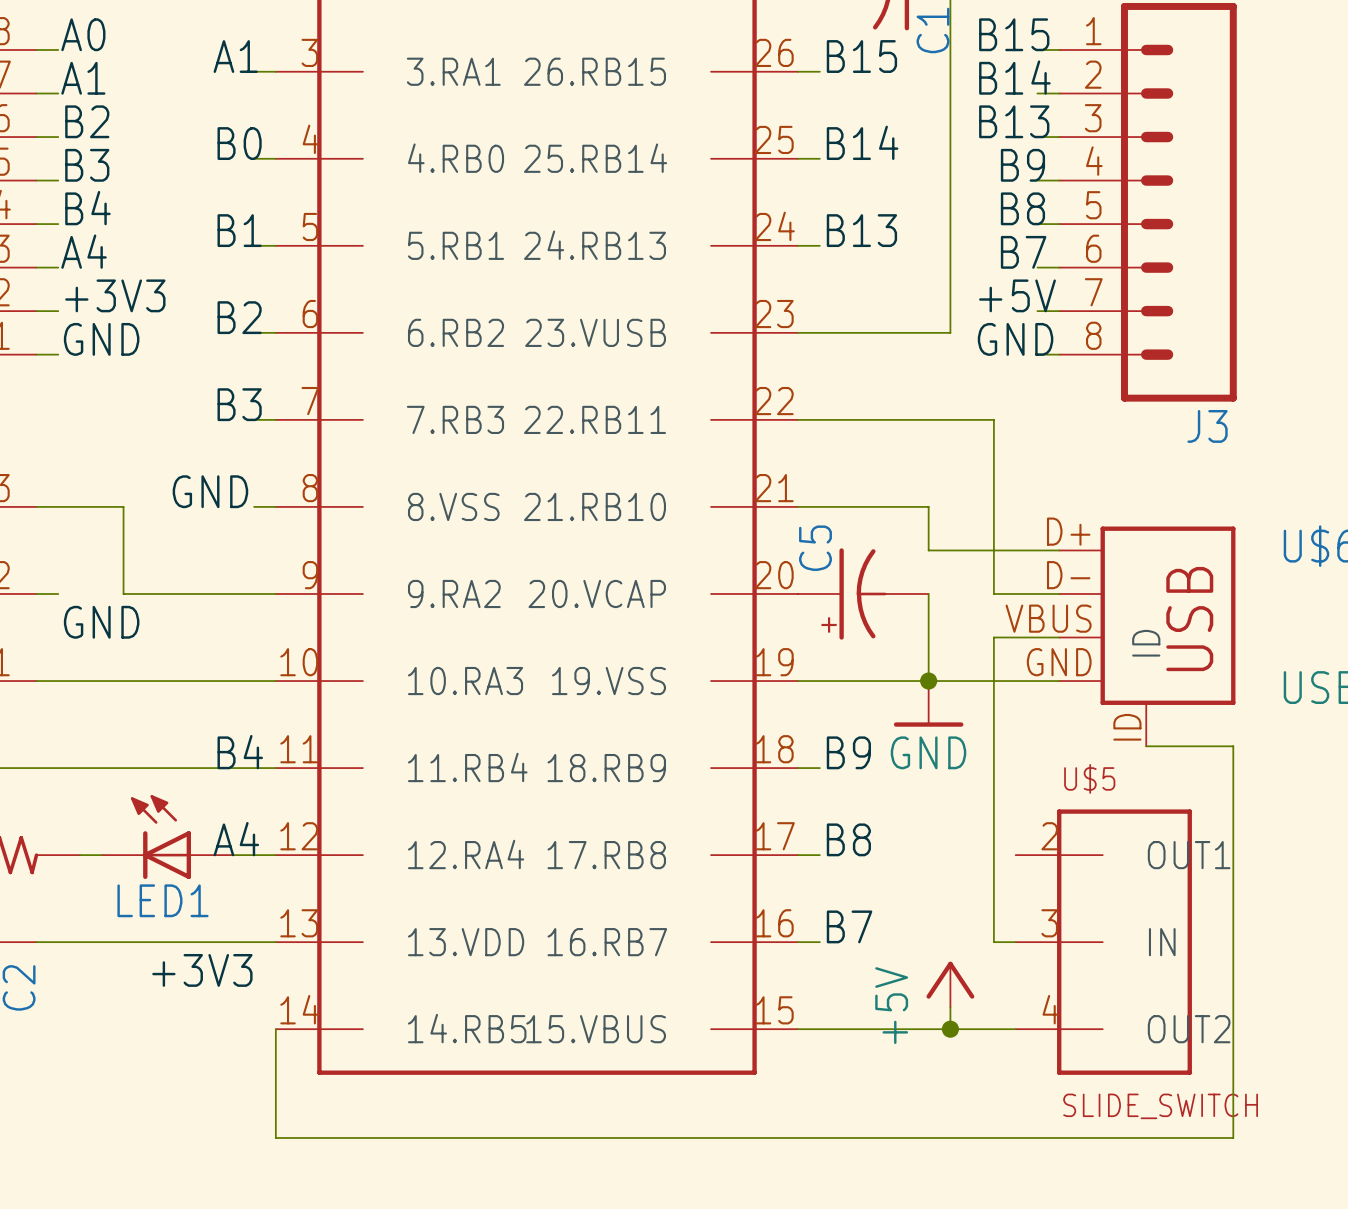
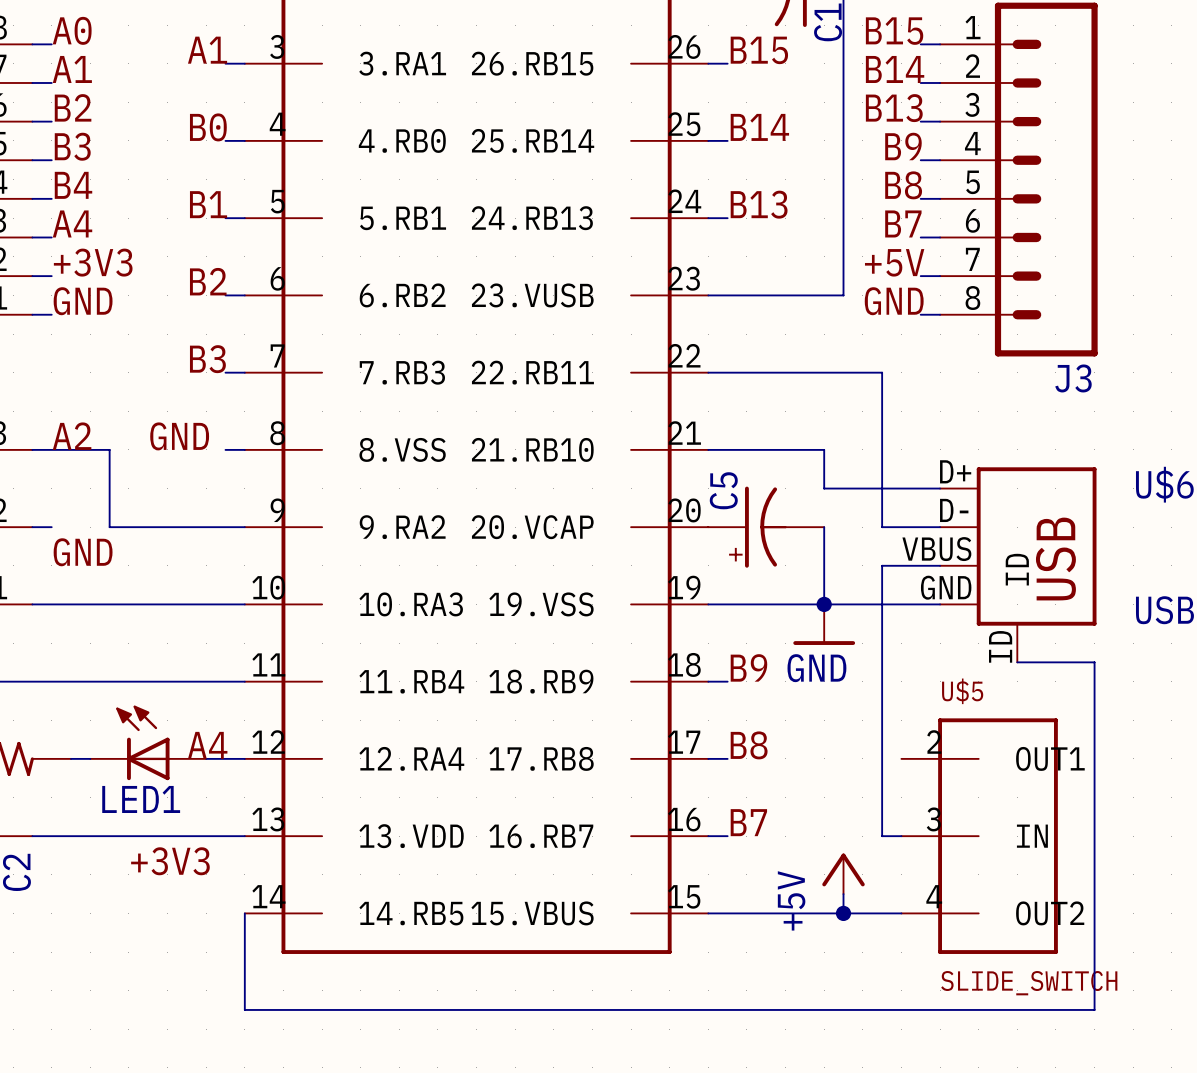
label: none -> A2 (72, 436)
label: B4 (240, 752) -> none

